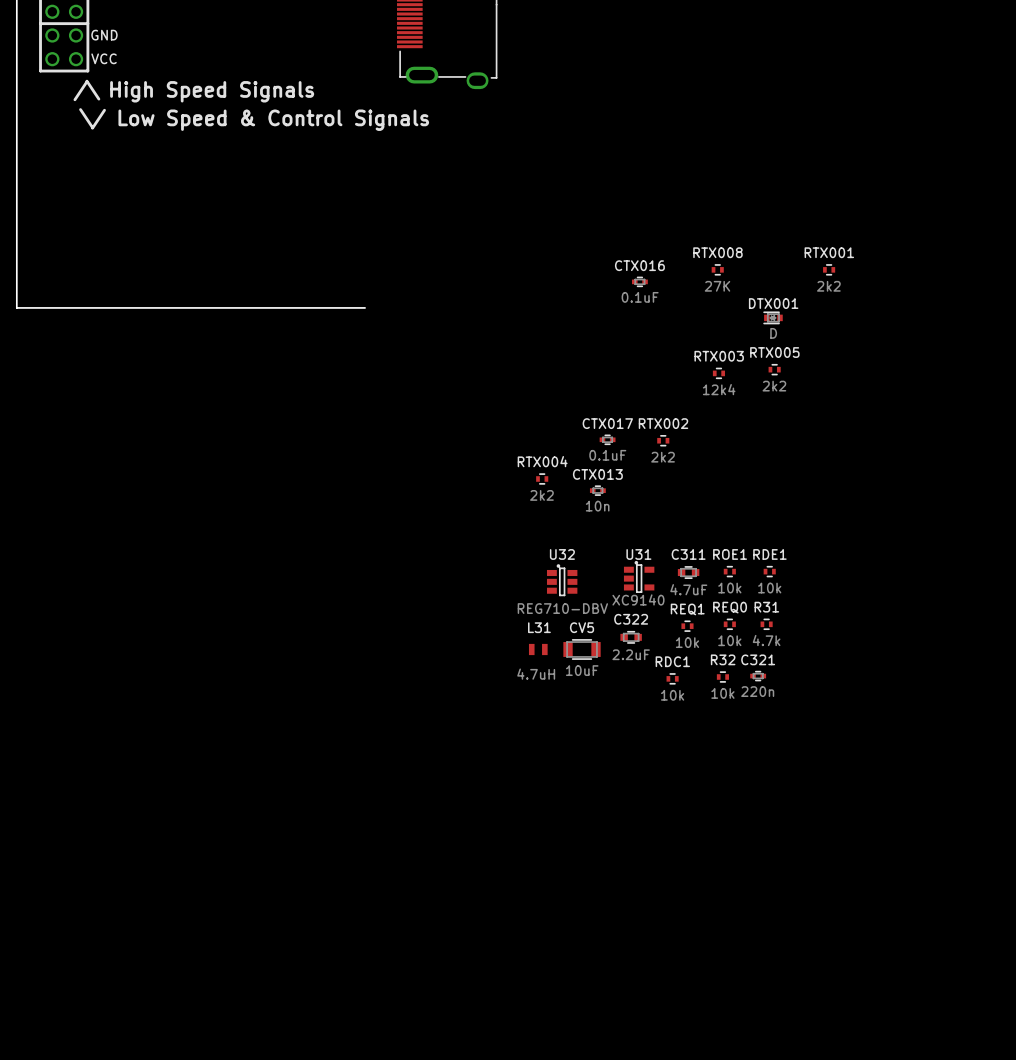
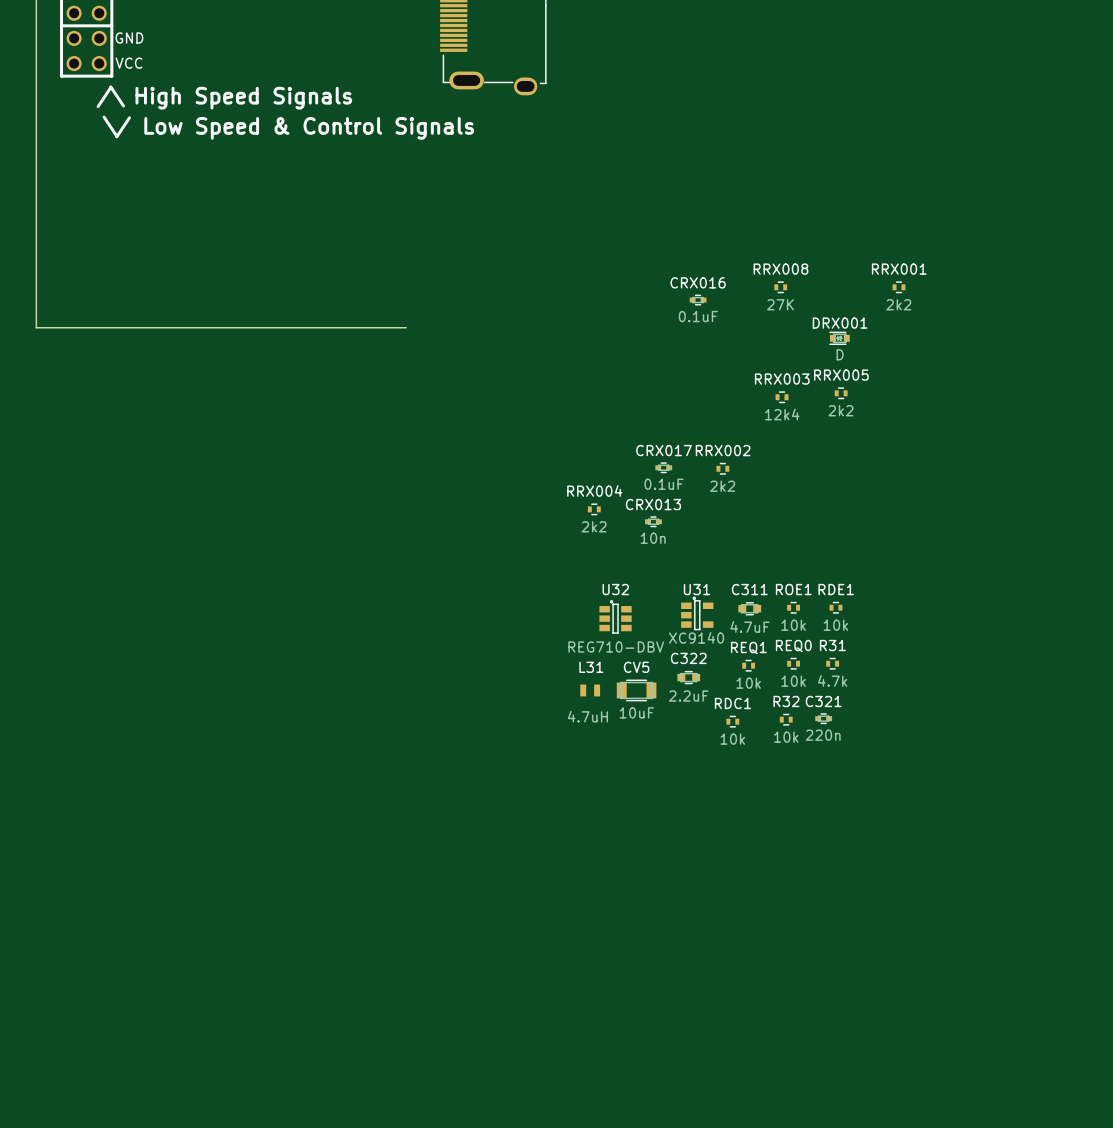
RTX008 name: RTX008 (717, 252) -> RRX008 (780, 269)
RTX001 name: RTX001 (829, 252) -> RRX001 (899, 269)
CTX016 name: CTX016 (639, 265) -> CRX016 (698, 282)
DTX001 name: DTX001 (773, 303) -> DRX001 (840, 323)
RTX005 name: RTX005 (774, 352) -> RRX005 (841, 375)
RTX003 name: RTX003 (719, 356) -> RRX003 (782, 379)
CTX017 name: CTX017 (607, 423) -> CRX017 (663, 450)
RTX002 name: RTX002 (663, 423) -> RRX002 (723, 450)
RTX004 name: RTX004 (542, 461) -> RRX004 (594, 490)
CTX013 name: CTX013 (597, 474) -> CRX013 (653, 504)

